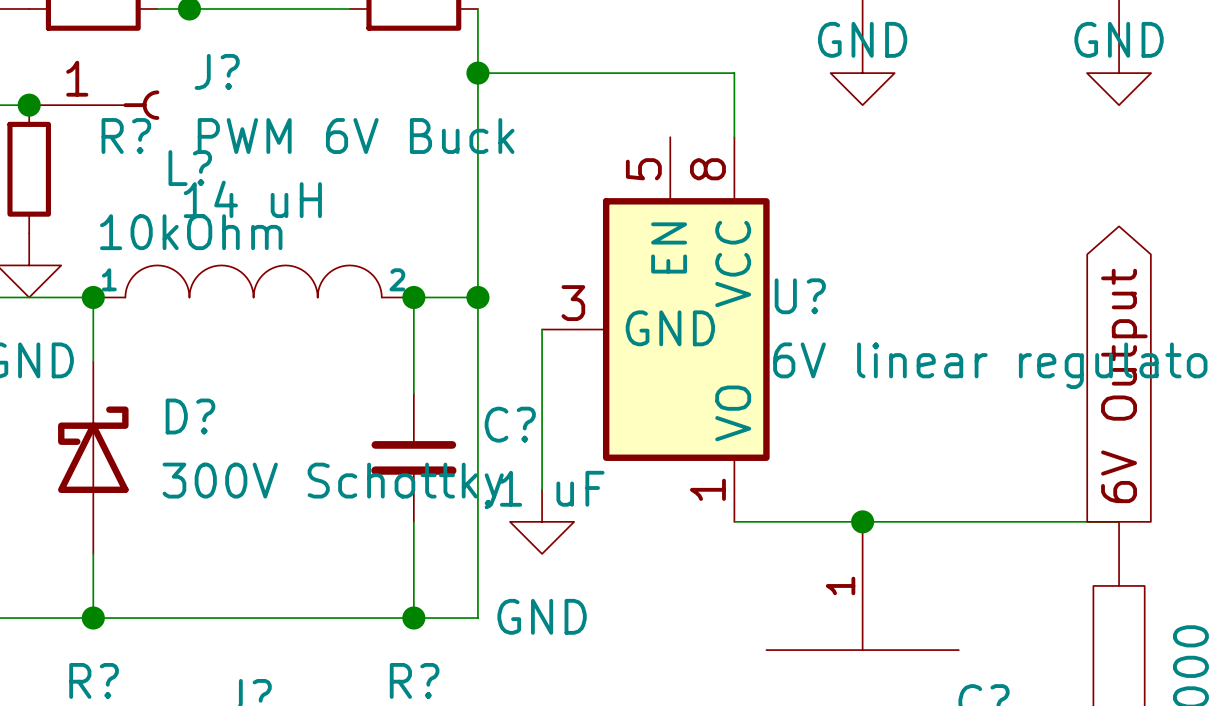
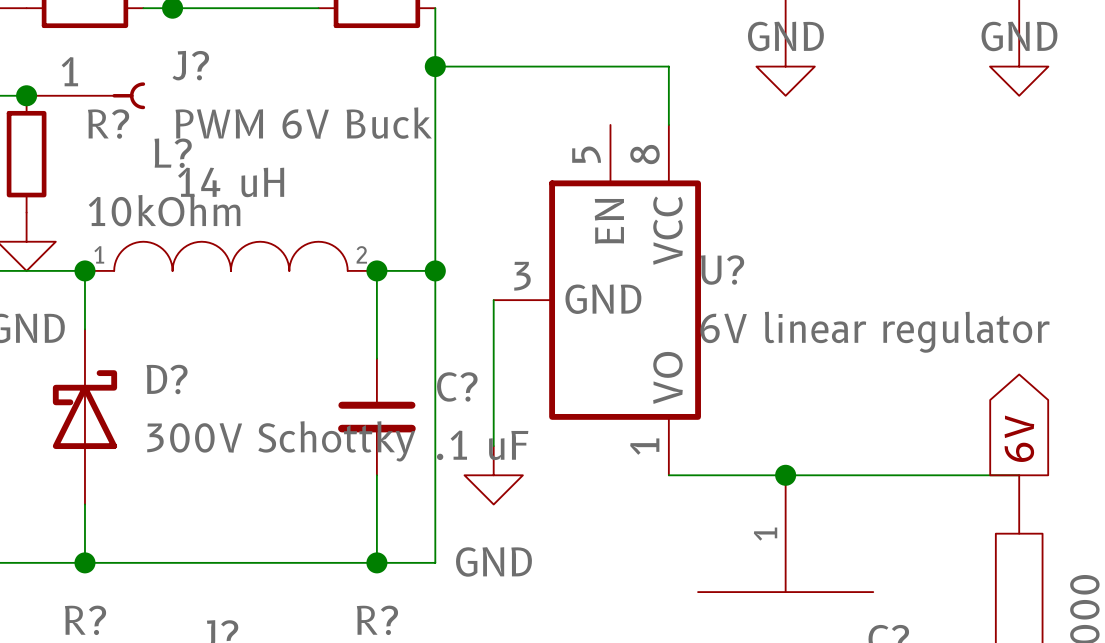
global label: 6V Output (1124, 385) -> 6V (1019, 438)

